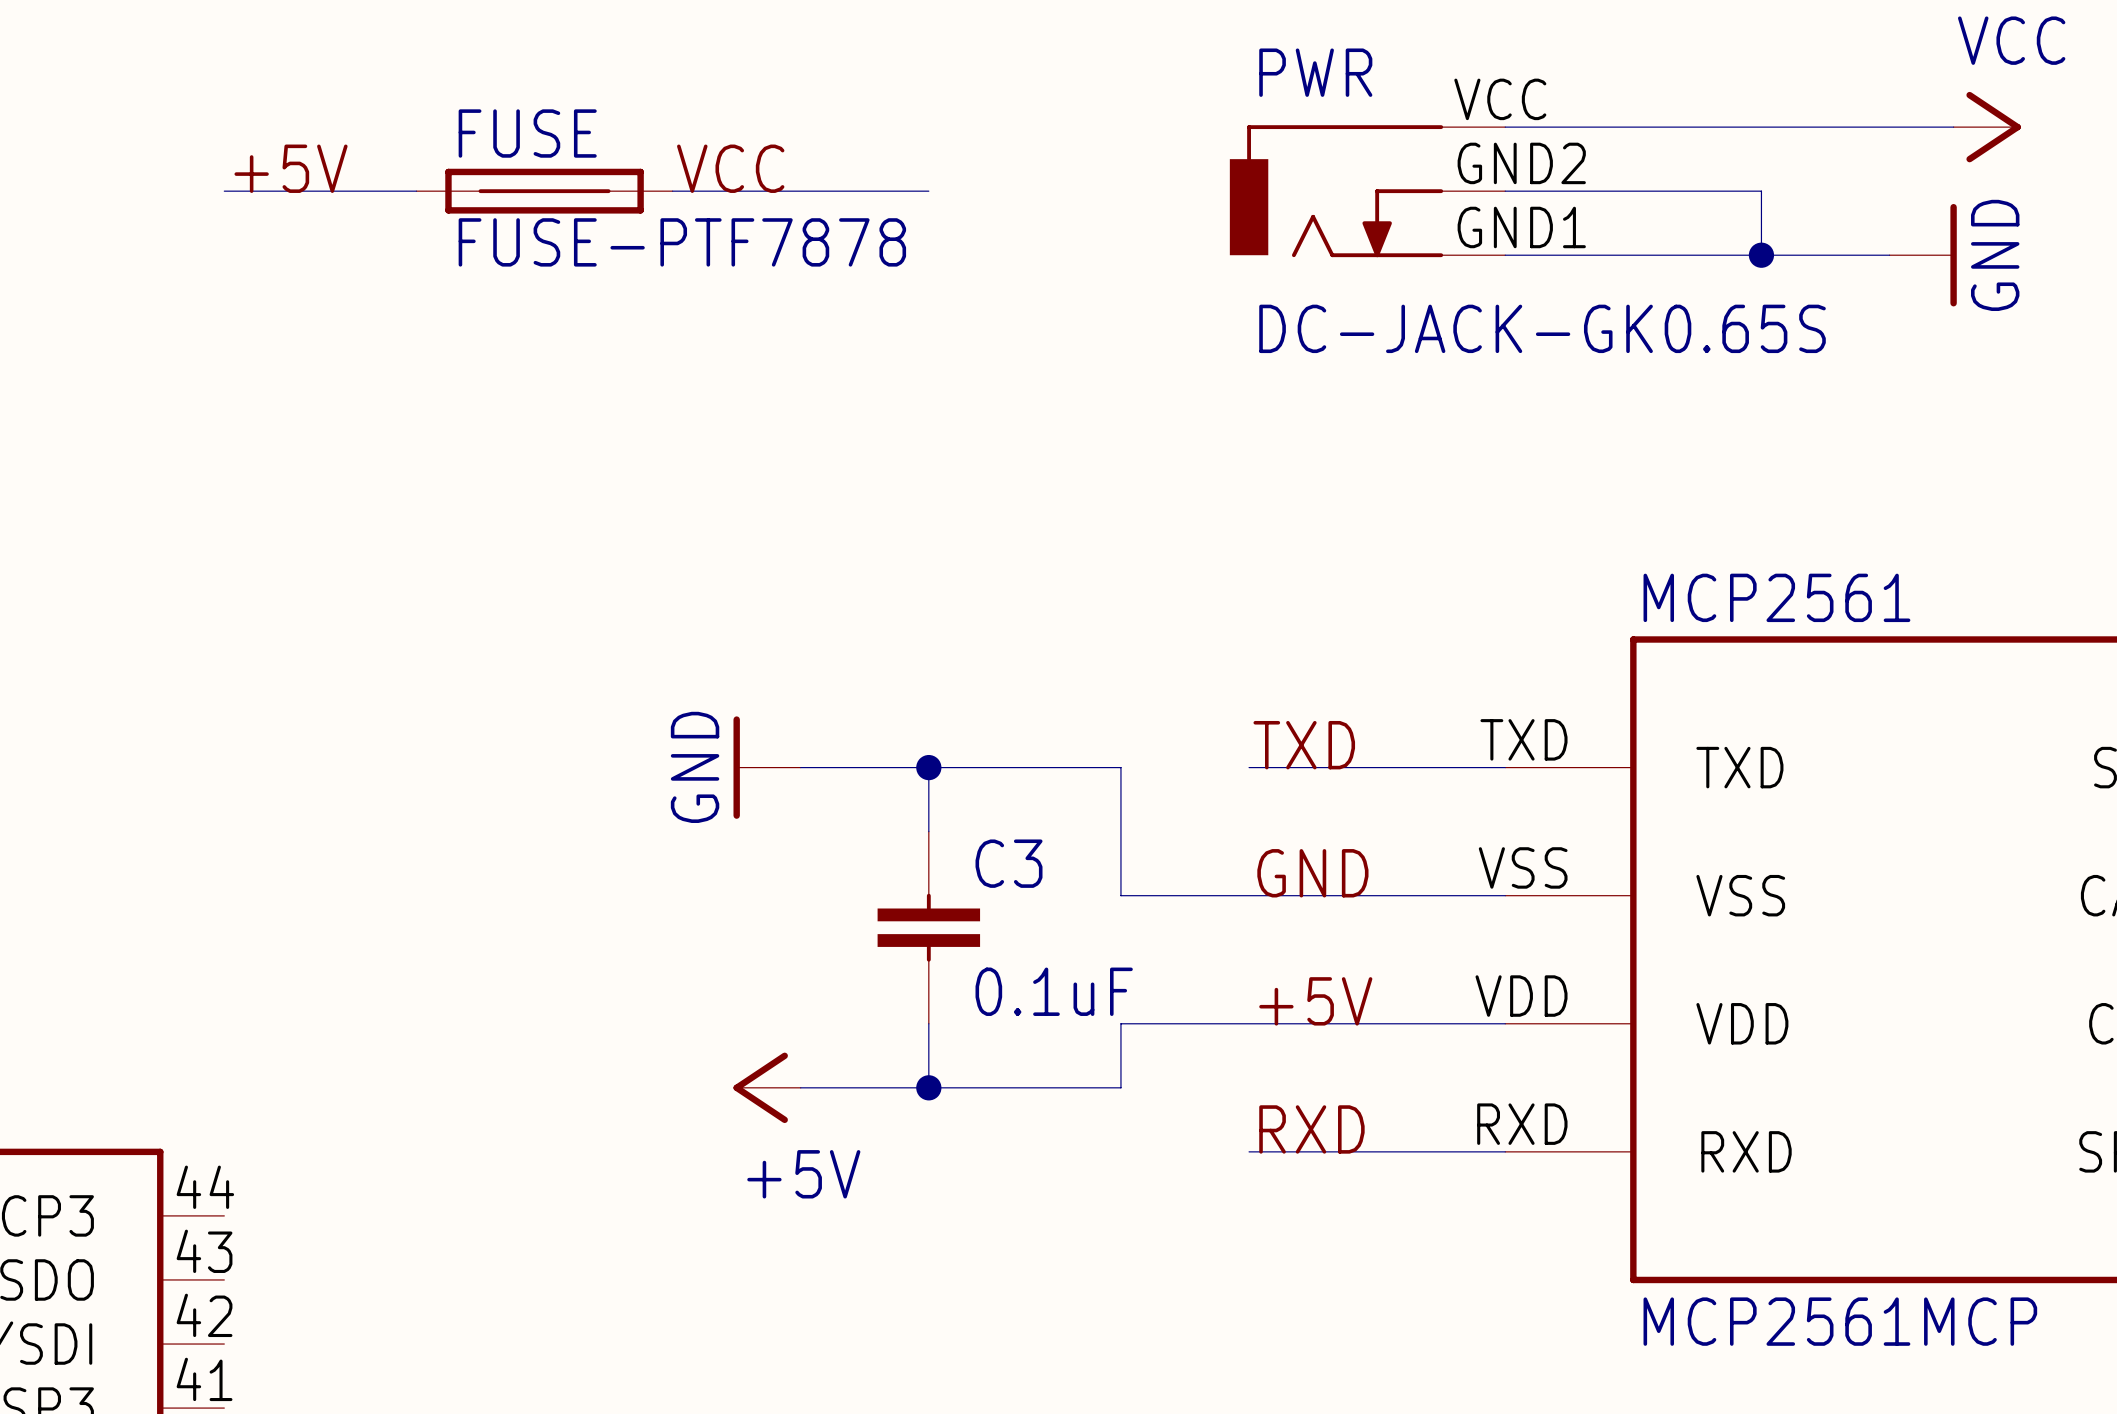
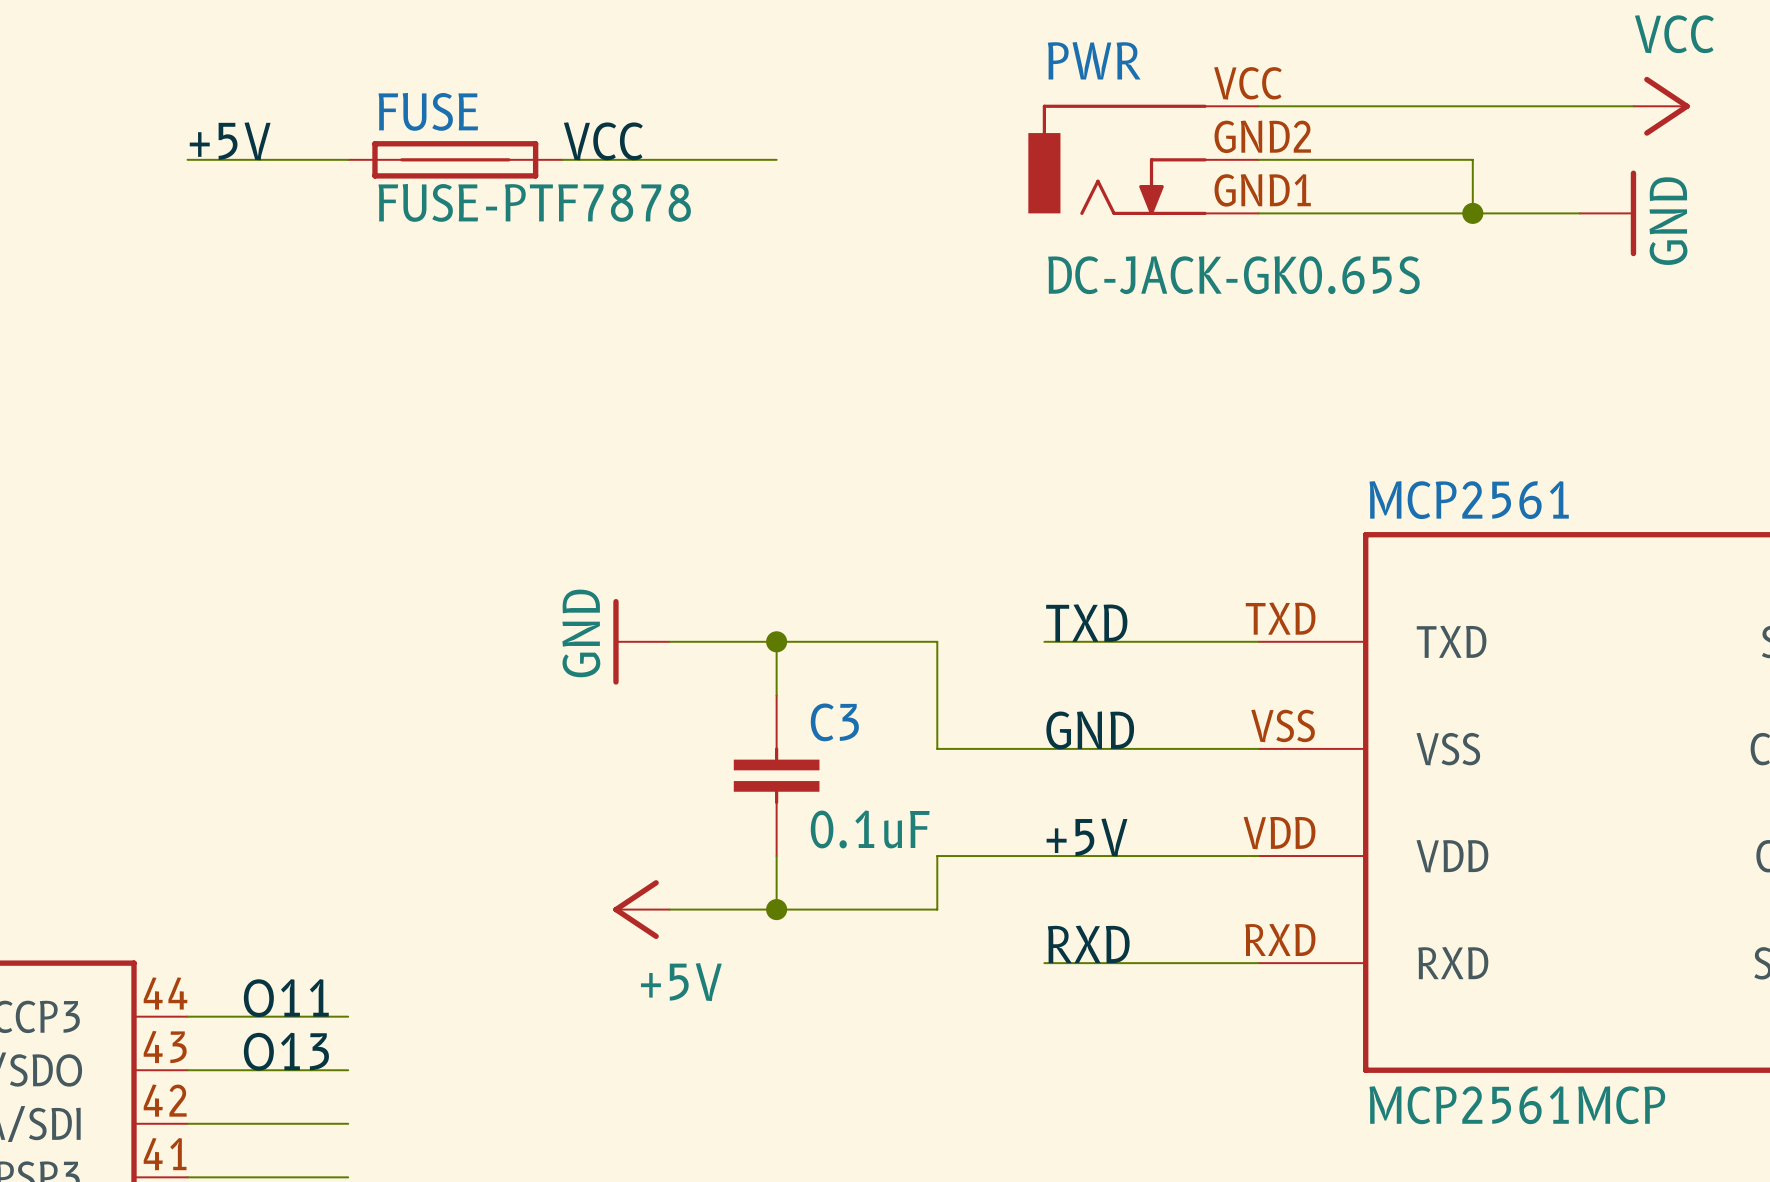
label: none -> O11 (286, 998)
wire: none -> (187, 1016) (348, 1016)
label: none -> O13 (286, 1051)
wire: none -> (187, 1070) (348, 1070)
wire: none -> (187, 1123) (348, 1123)
wire: none -> (187, 1177) (348, 1177)

